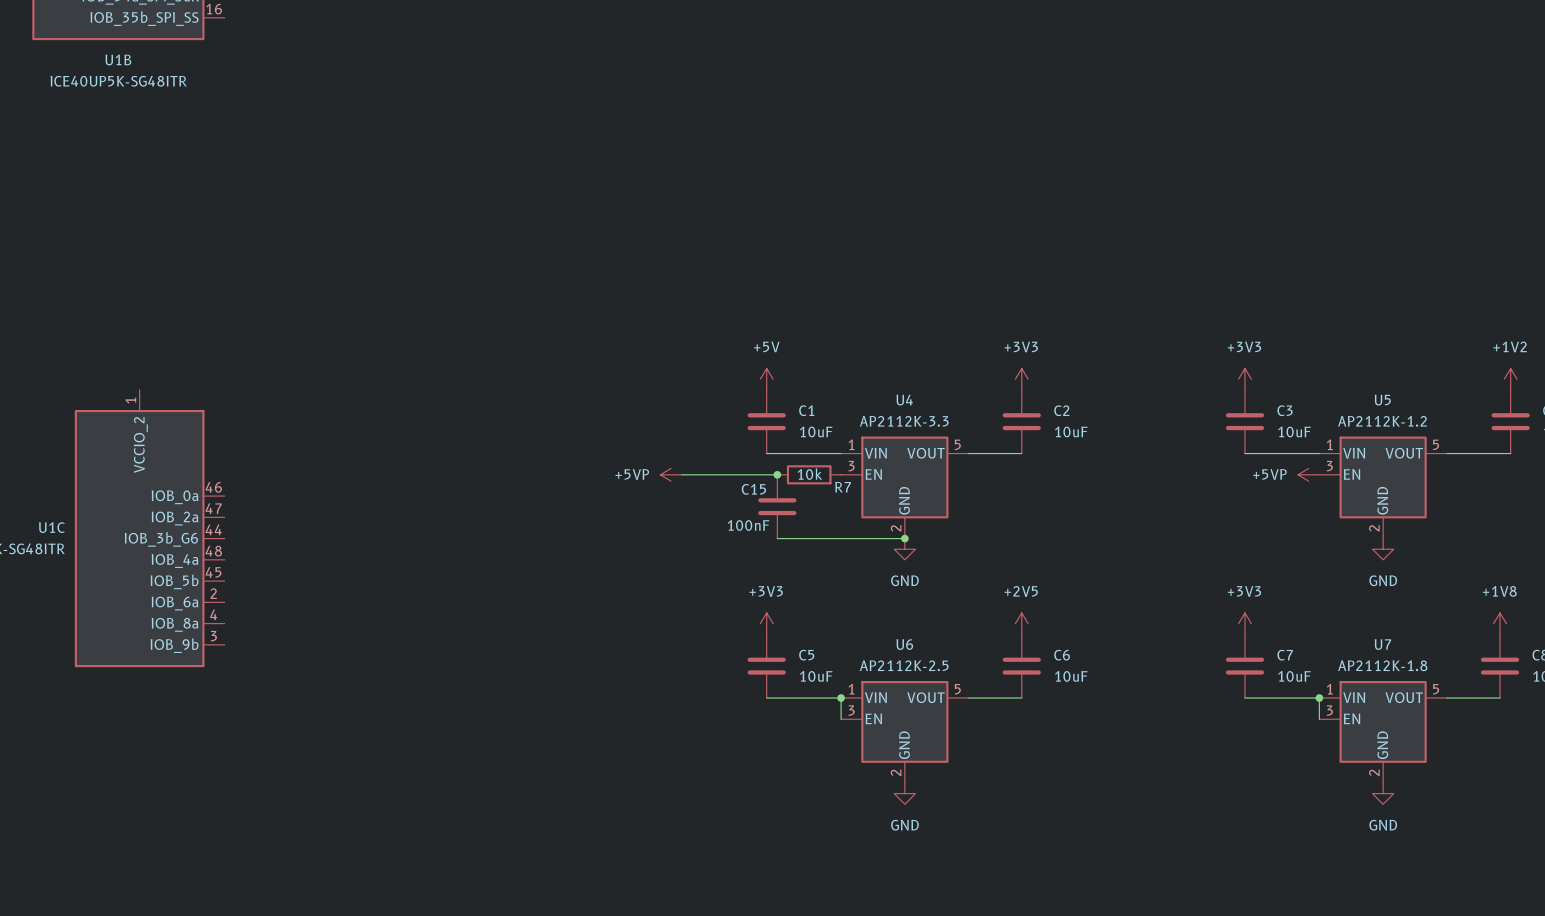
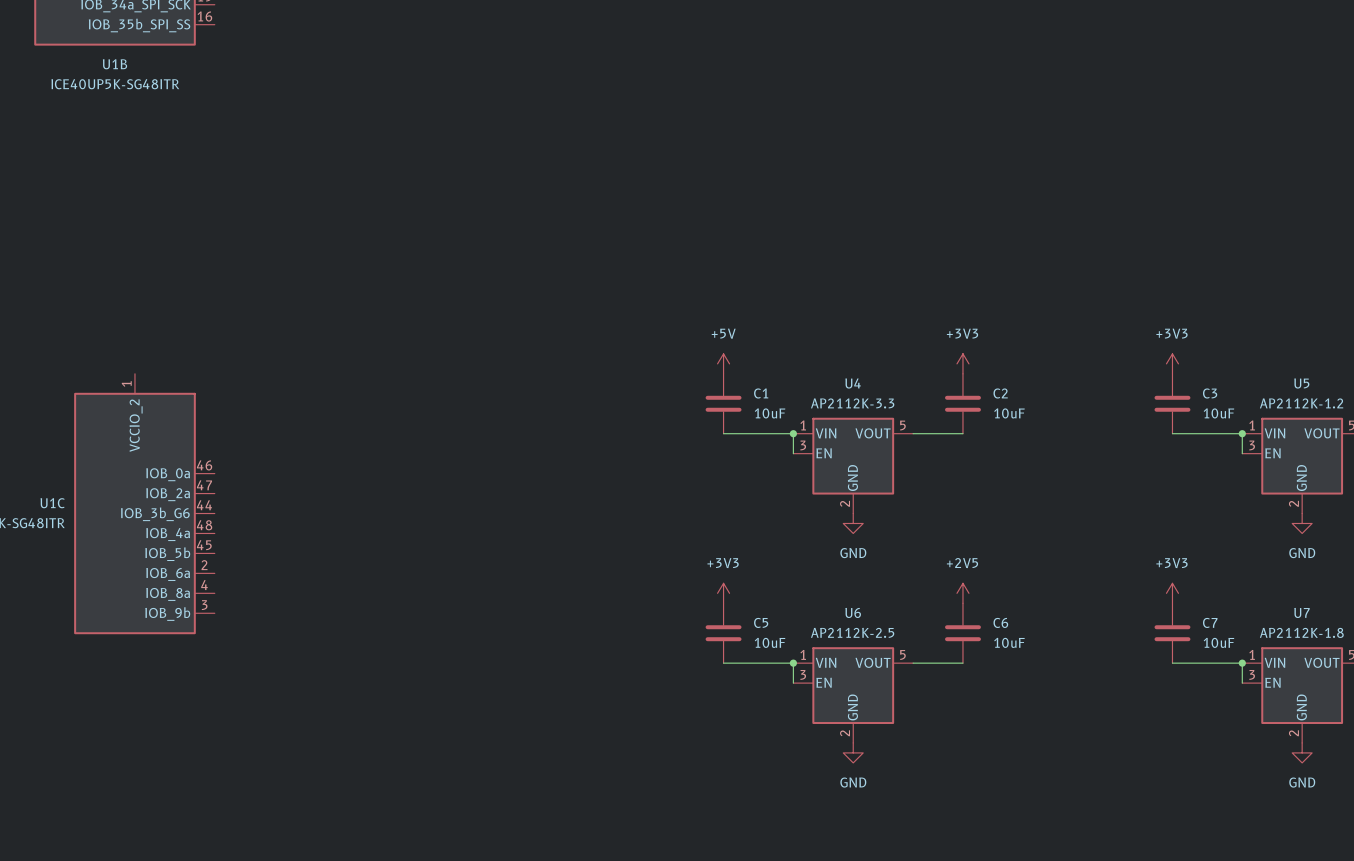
wire: none -> (793, 433) (793, 453)
junction: none -> (793, 433)
wire: none -> (1242, 433) (1242, 453)
junction: none -> (1242, 433)
power symbol: +5VP (671, 474) -> none
wire: (681, 474) (777, 474) -> none
junction: (777, 474) -> none
R7: 10k (809, 474) -> none
power symbol: +5VP (1308, 474) -> none
C15: 100nF (777, 506) -> none
wire: (777, 538) (904, 538) -> none
junction: (904, 538) -> none

